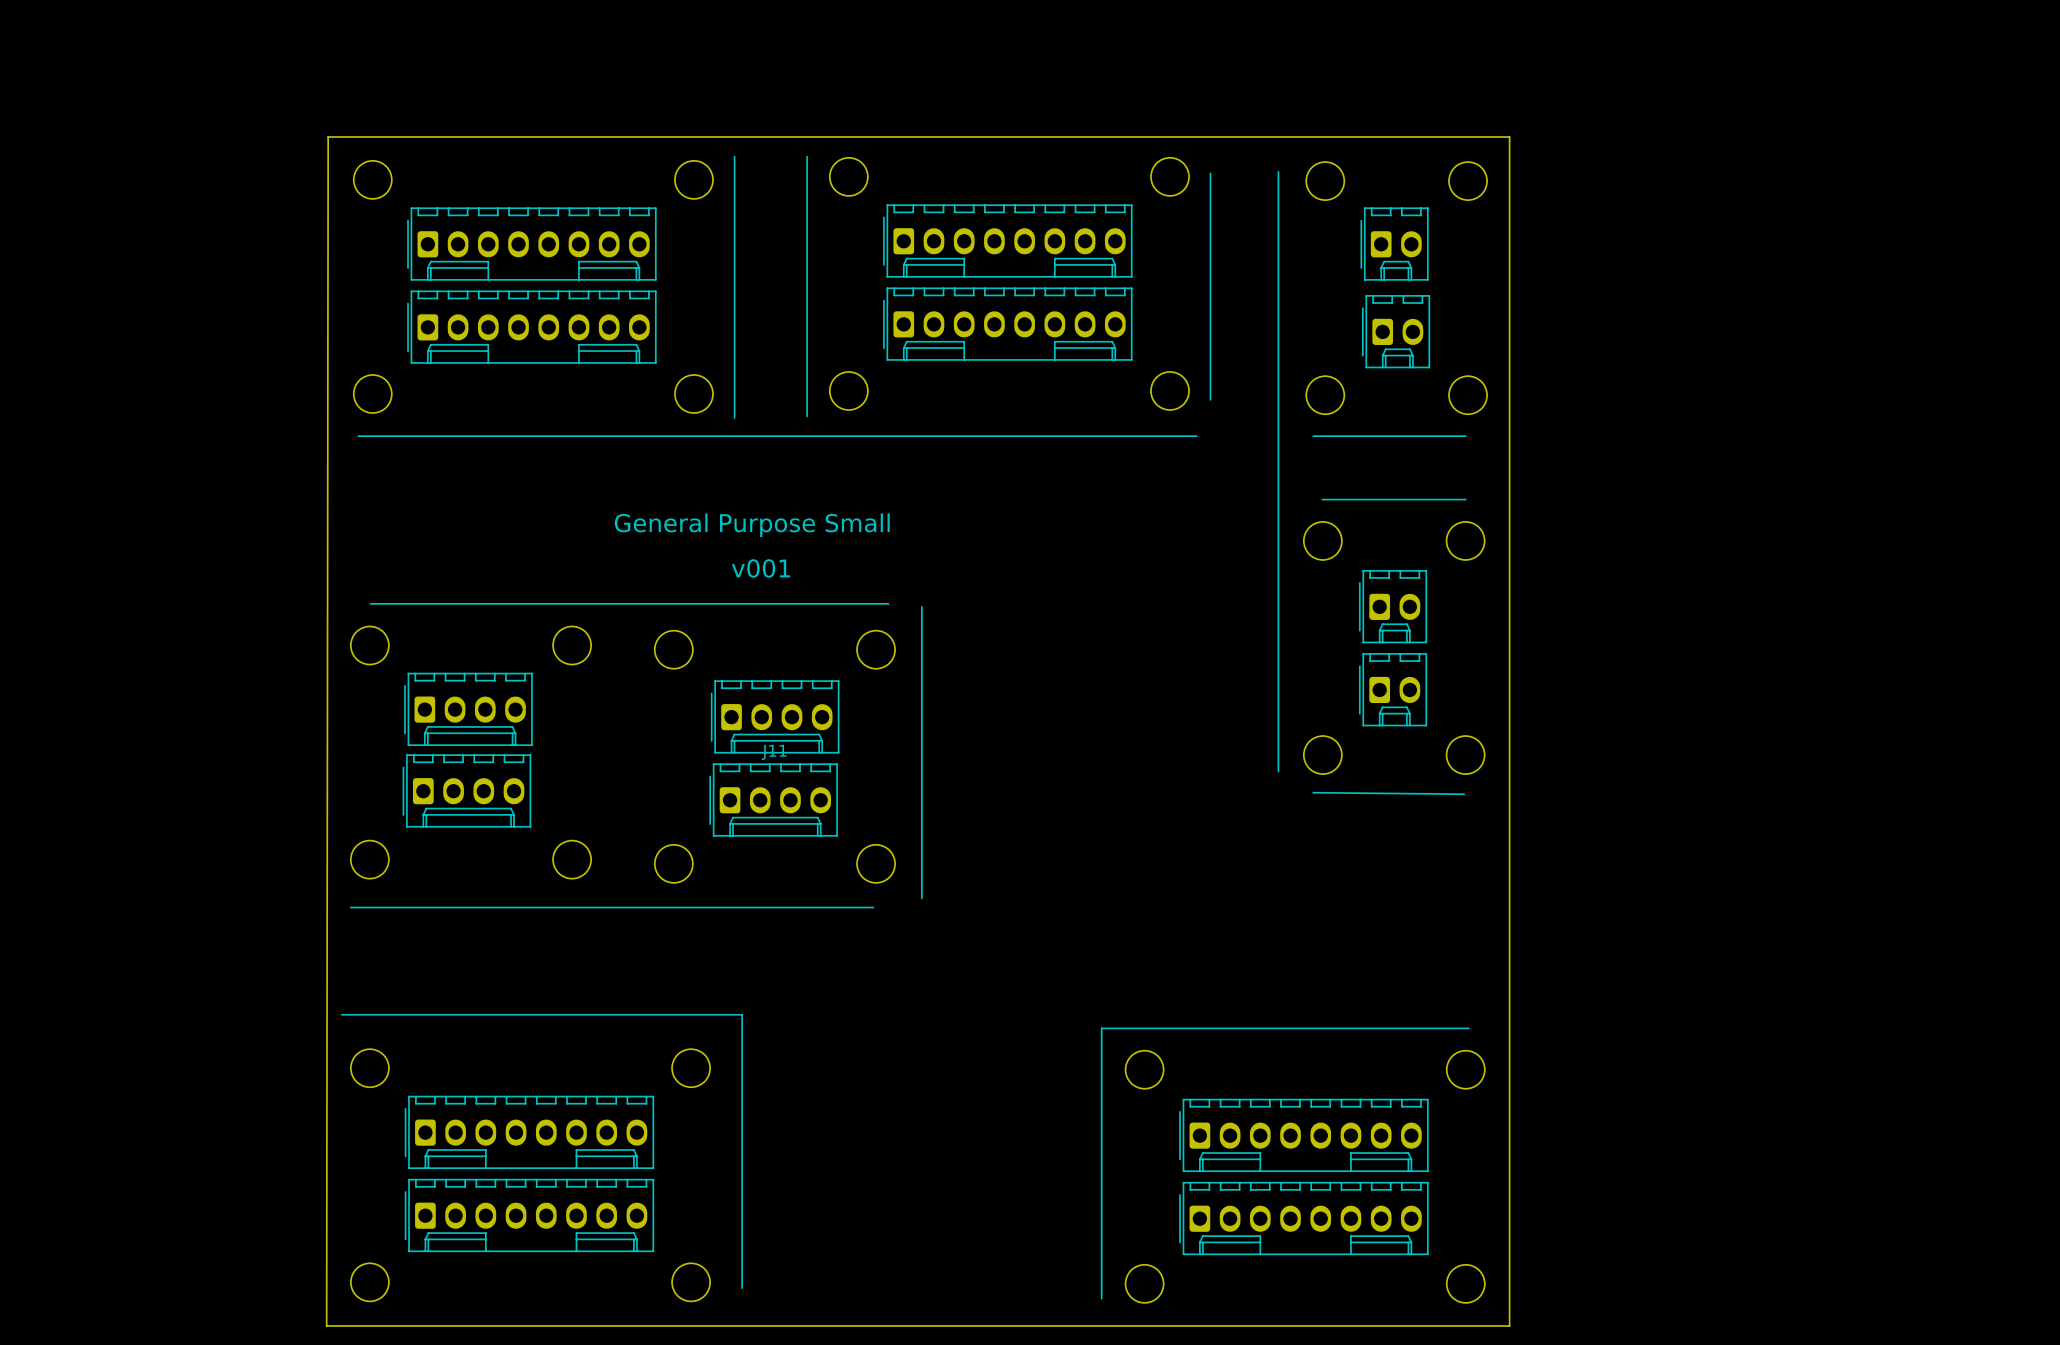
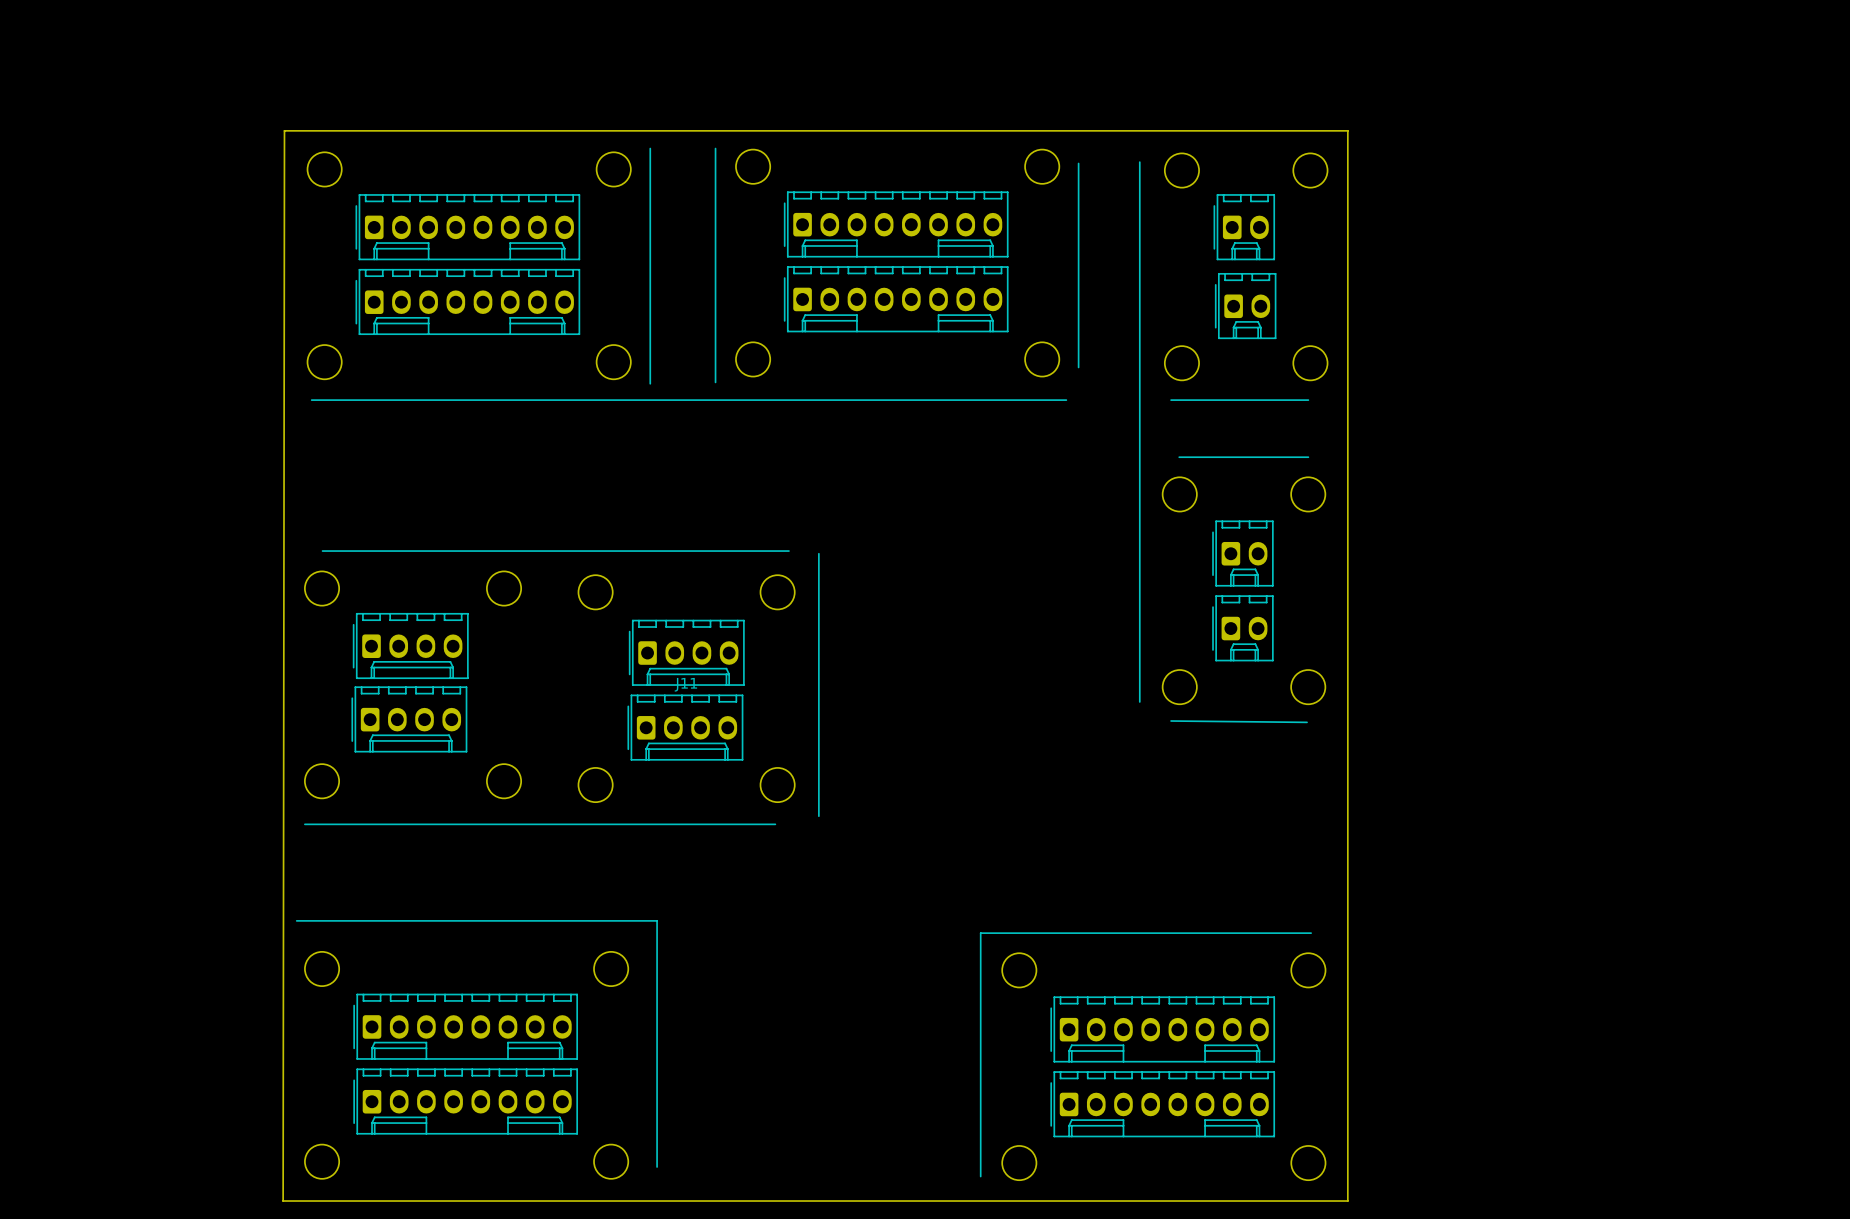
text: General Purpose Small (752, 525) -> none
text: v001 (760, 568) -> none

